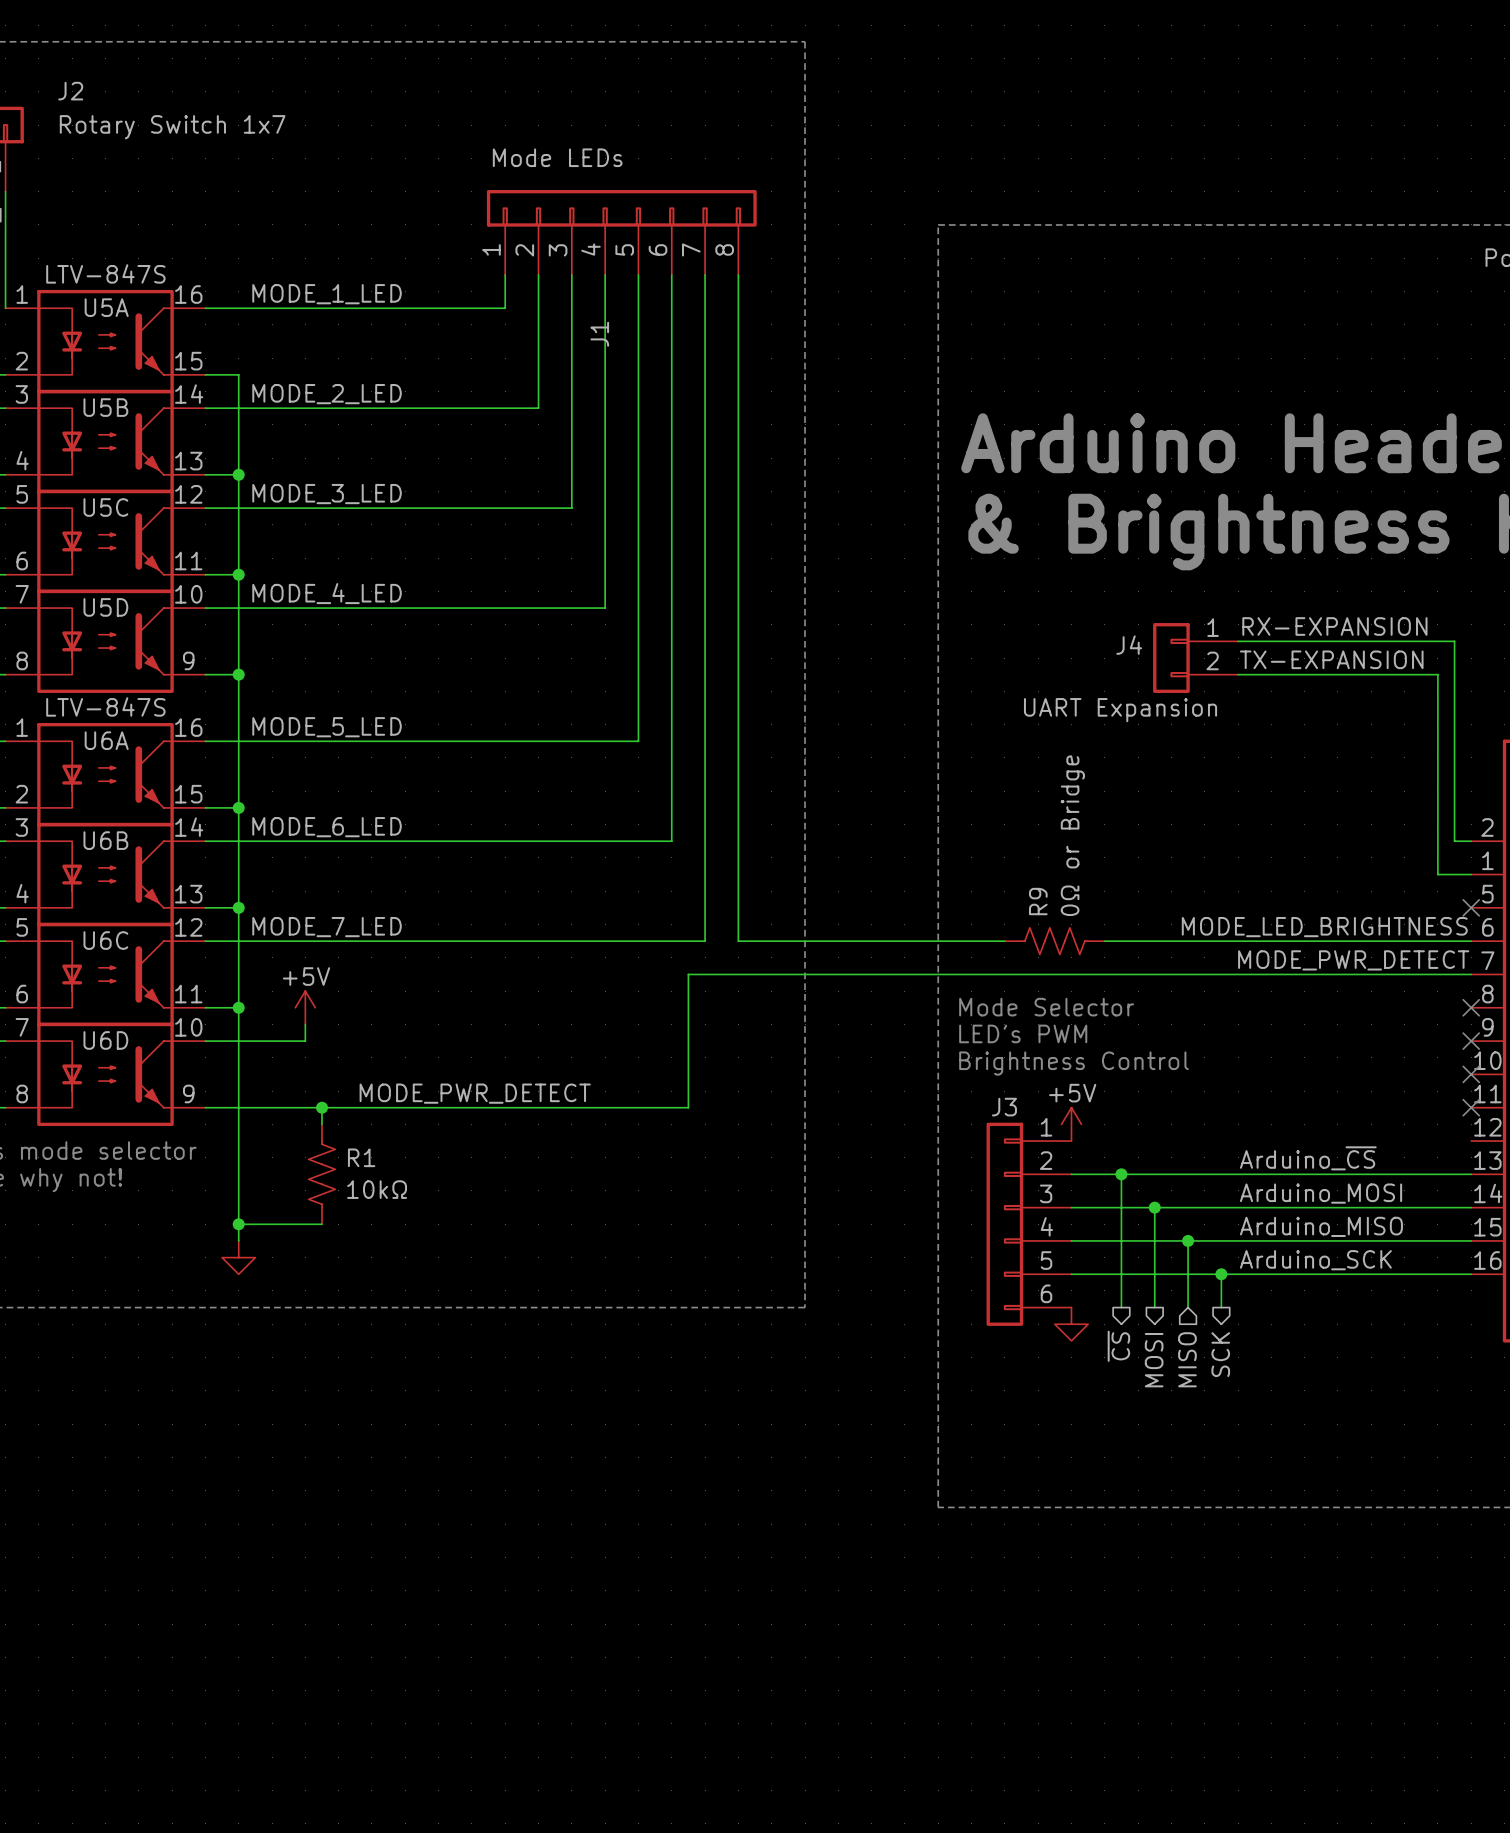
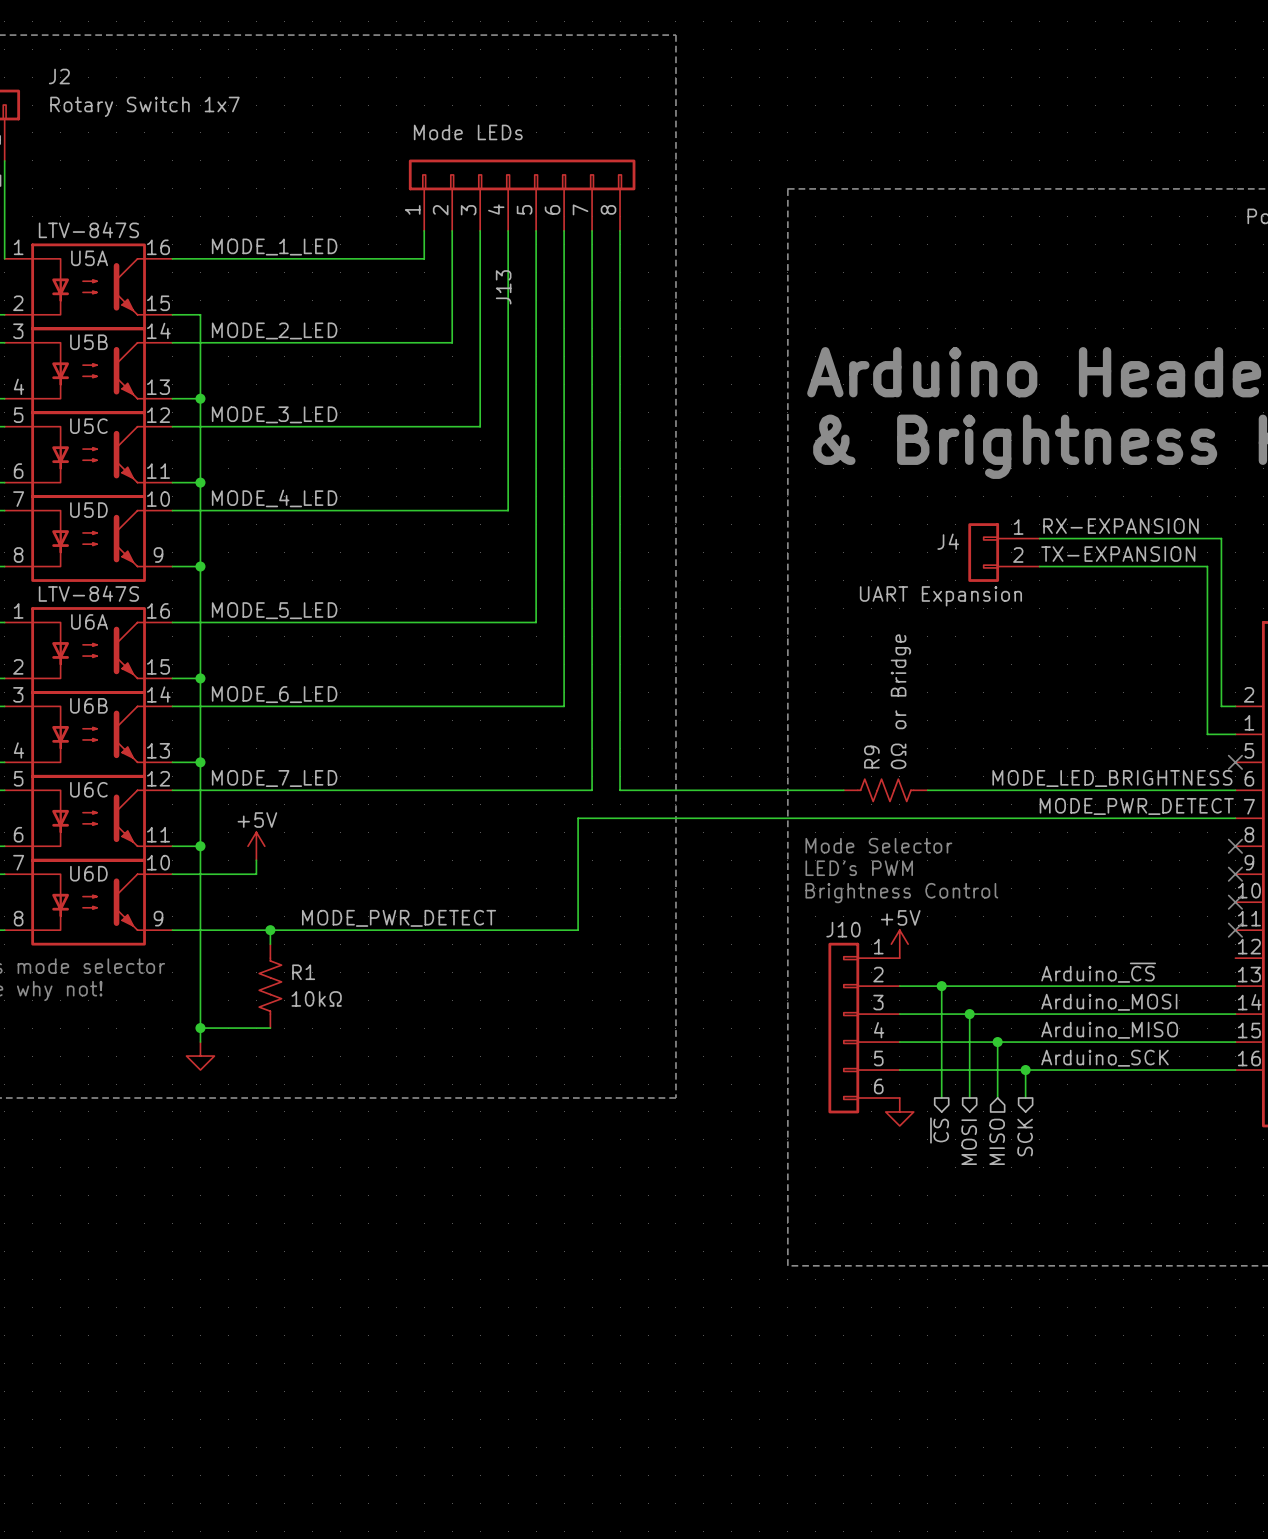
J1 name: J1 (599, 334) -> J13 (503, 287)
J3 name: J3 (1004, 1107) -> J10 (843, 929)

